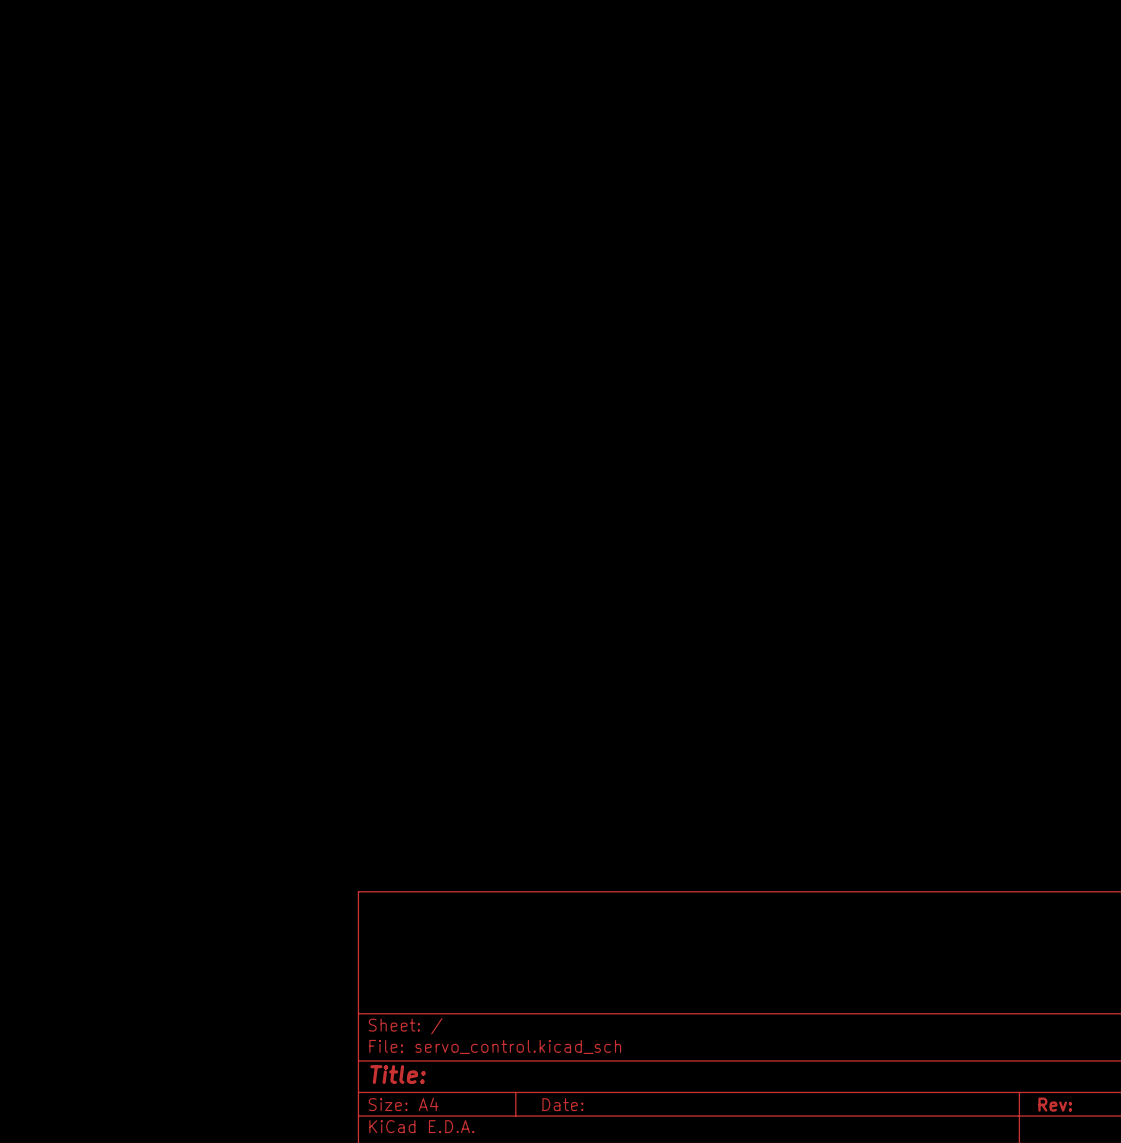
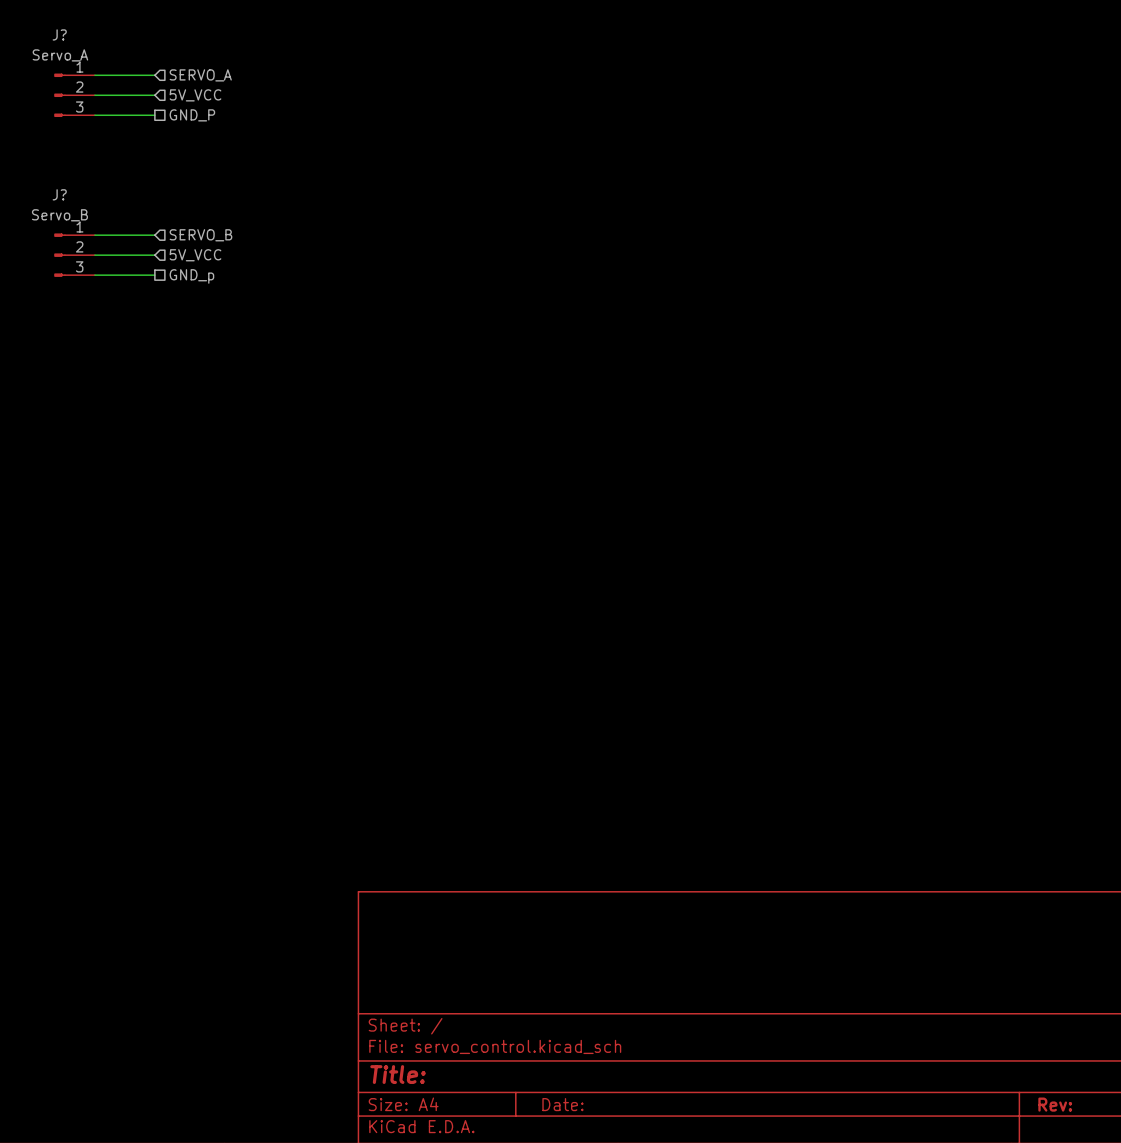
wire: none -> (94, 75) (154, 75)
hierarchical label: none -> SERVO_A (200, 75)
J?: none -> Servo_A (74, 95)
wire: none -> (94, 95) (154, 95)
hierarchical label: none -> 5V_VCC (195, 95)
wire: none -> (94, 115) (154, 115)
hierarchical label: none -> GND_P (192, 115)
wire: none -> (94, 235) (154, 235)
hierarchical label: none -> SERVO_B (200, 235)
J?: none -> Servo_B (74, 255)
wire: none -> (94, 255) (154, 255)
hierarchical label: none -> 5V_VCC (195, 255)
wire: none -> (94, 275) (154, 275)
hierarchical label: none -> GND_p (191, 276)

